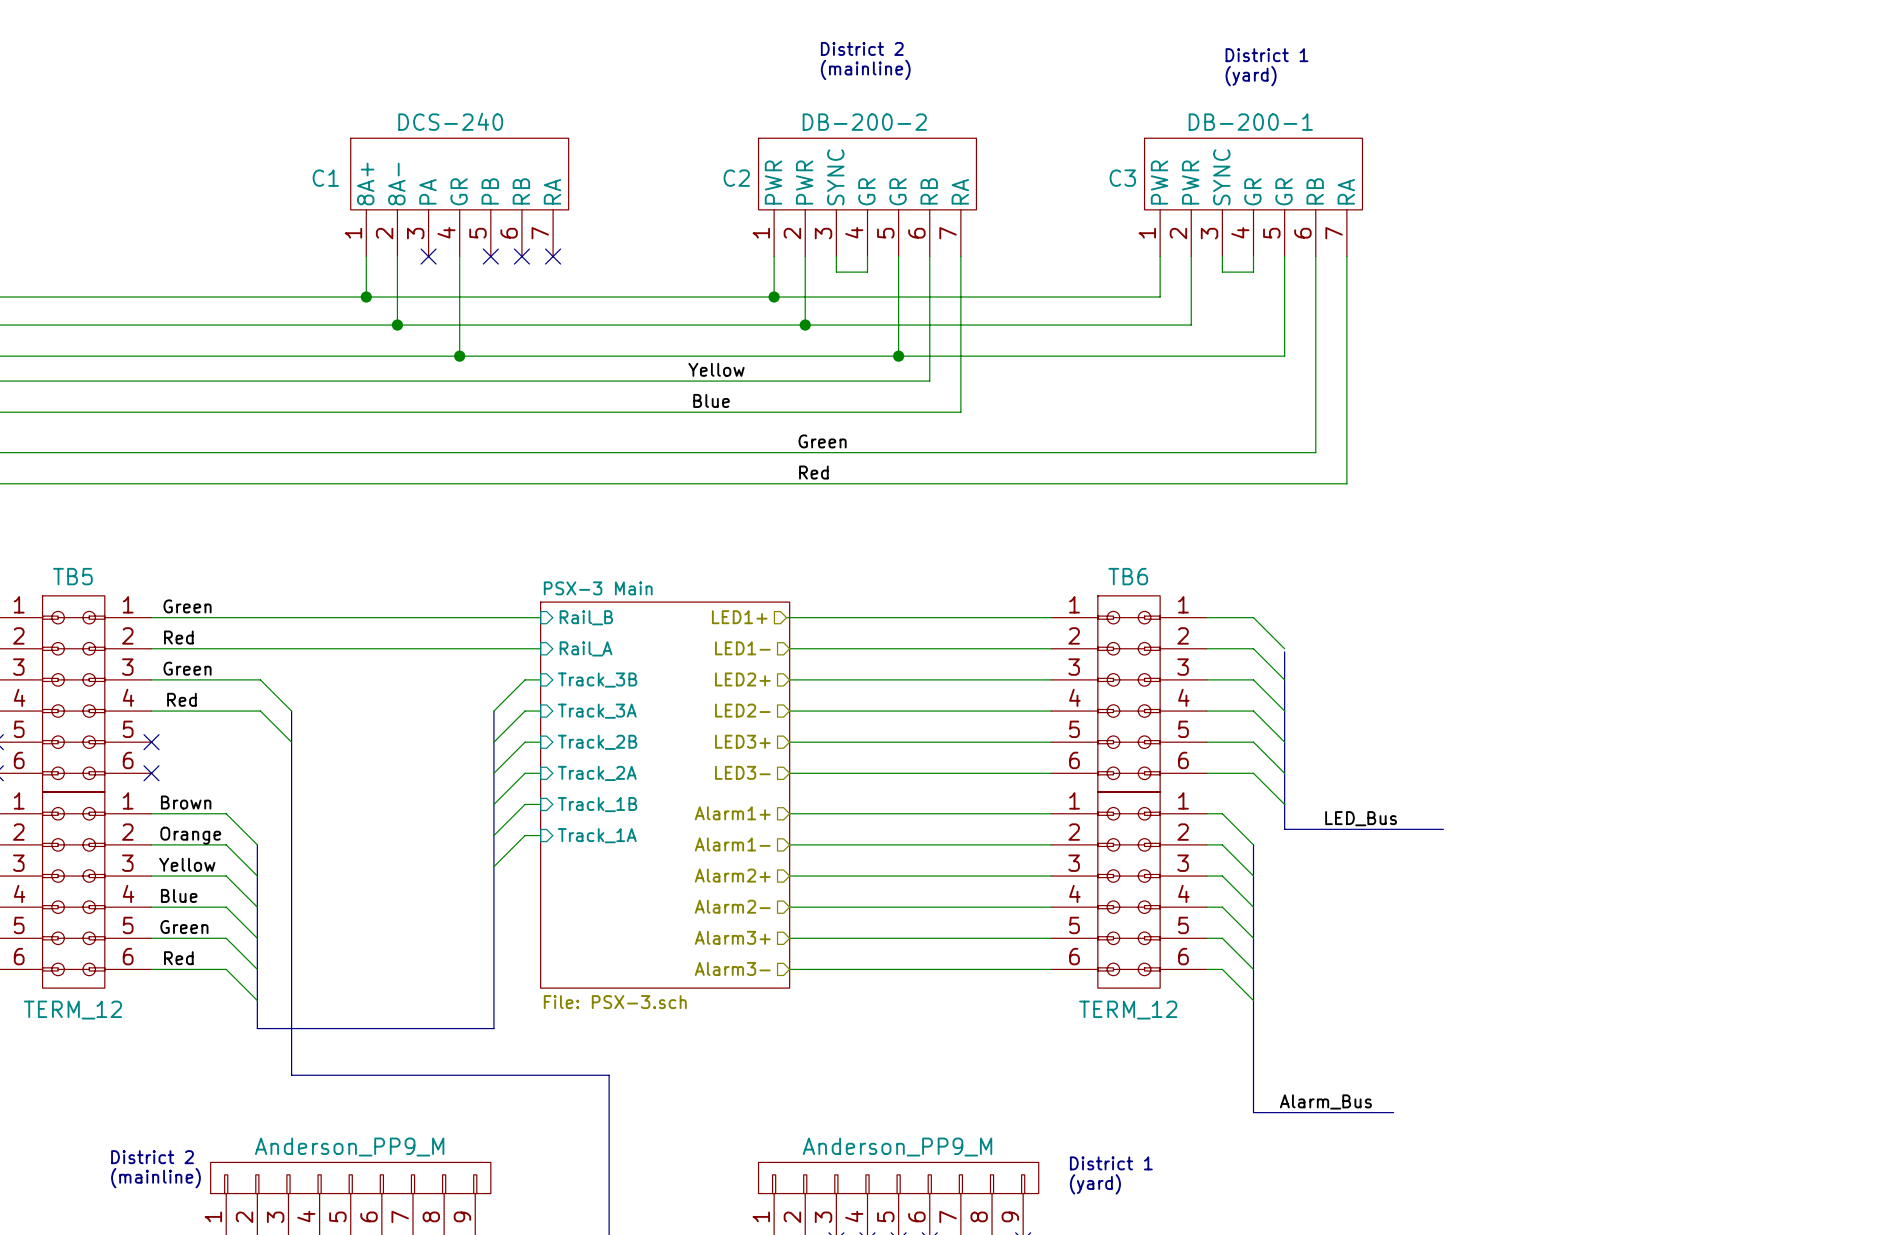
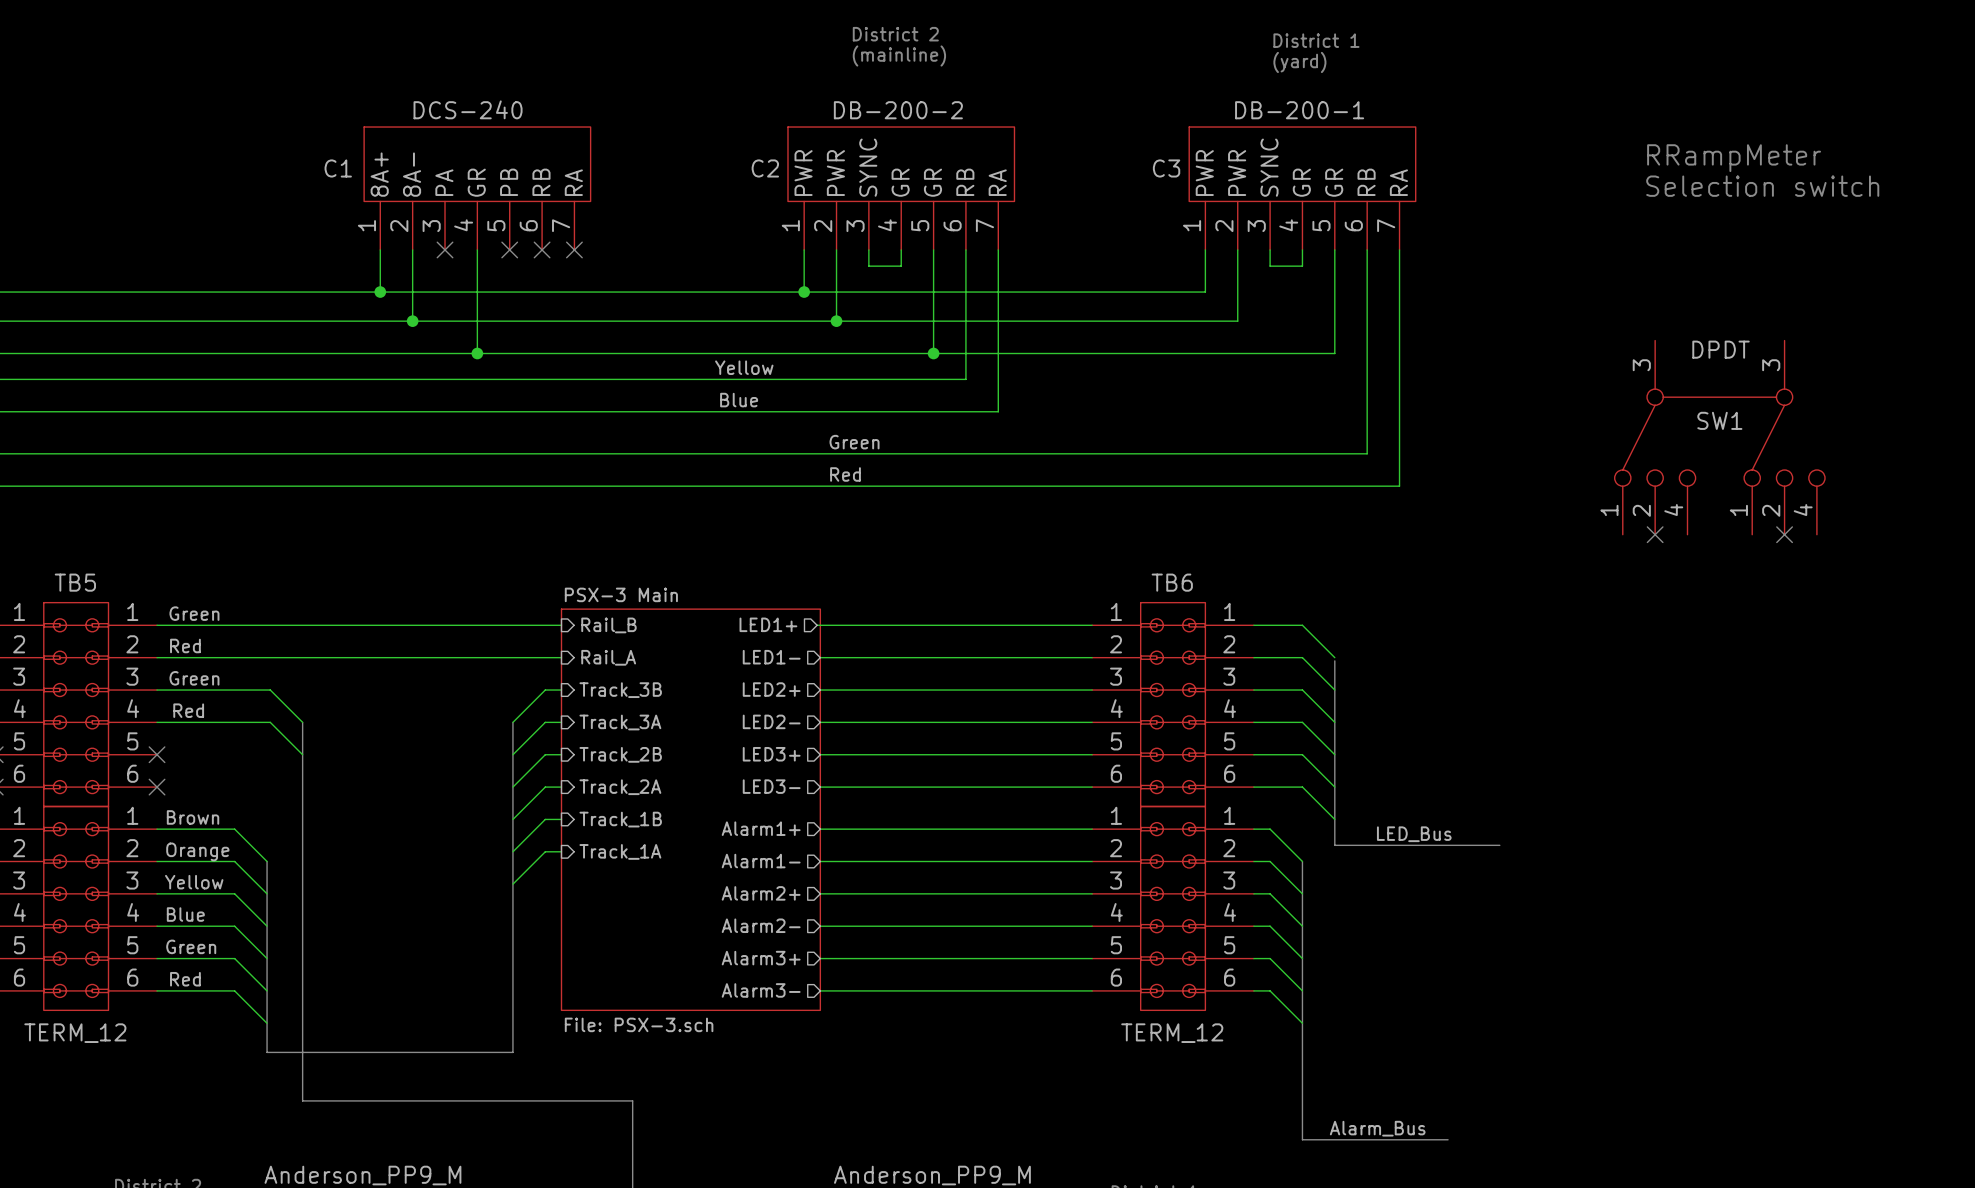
text: none -> RRampMeter (1734, 158)
text: none -> Selection switch (1762, 186)
SW1: none -> DPDT (1719, 437)
no-connect mark: none -> (1655, 534)
no-connect mark: none -> (1784, 534)

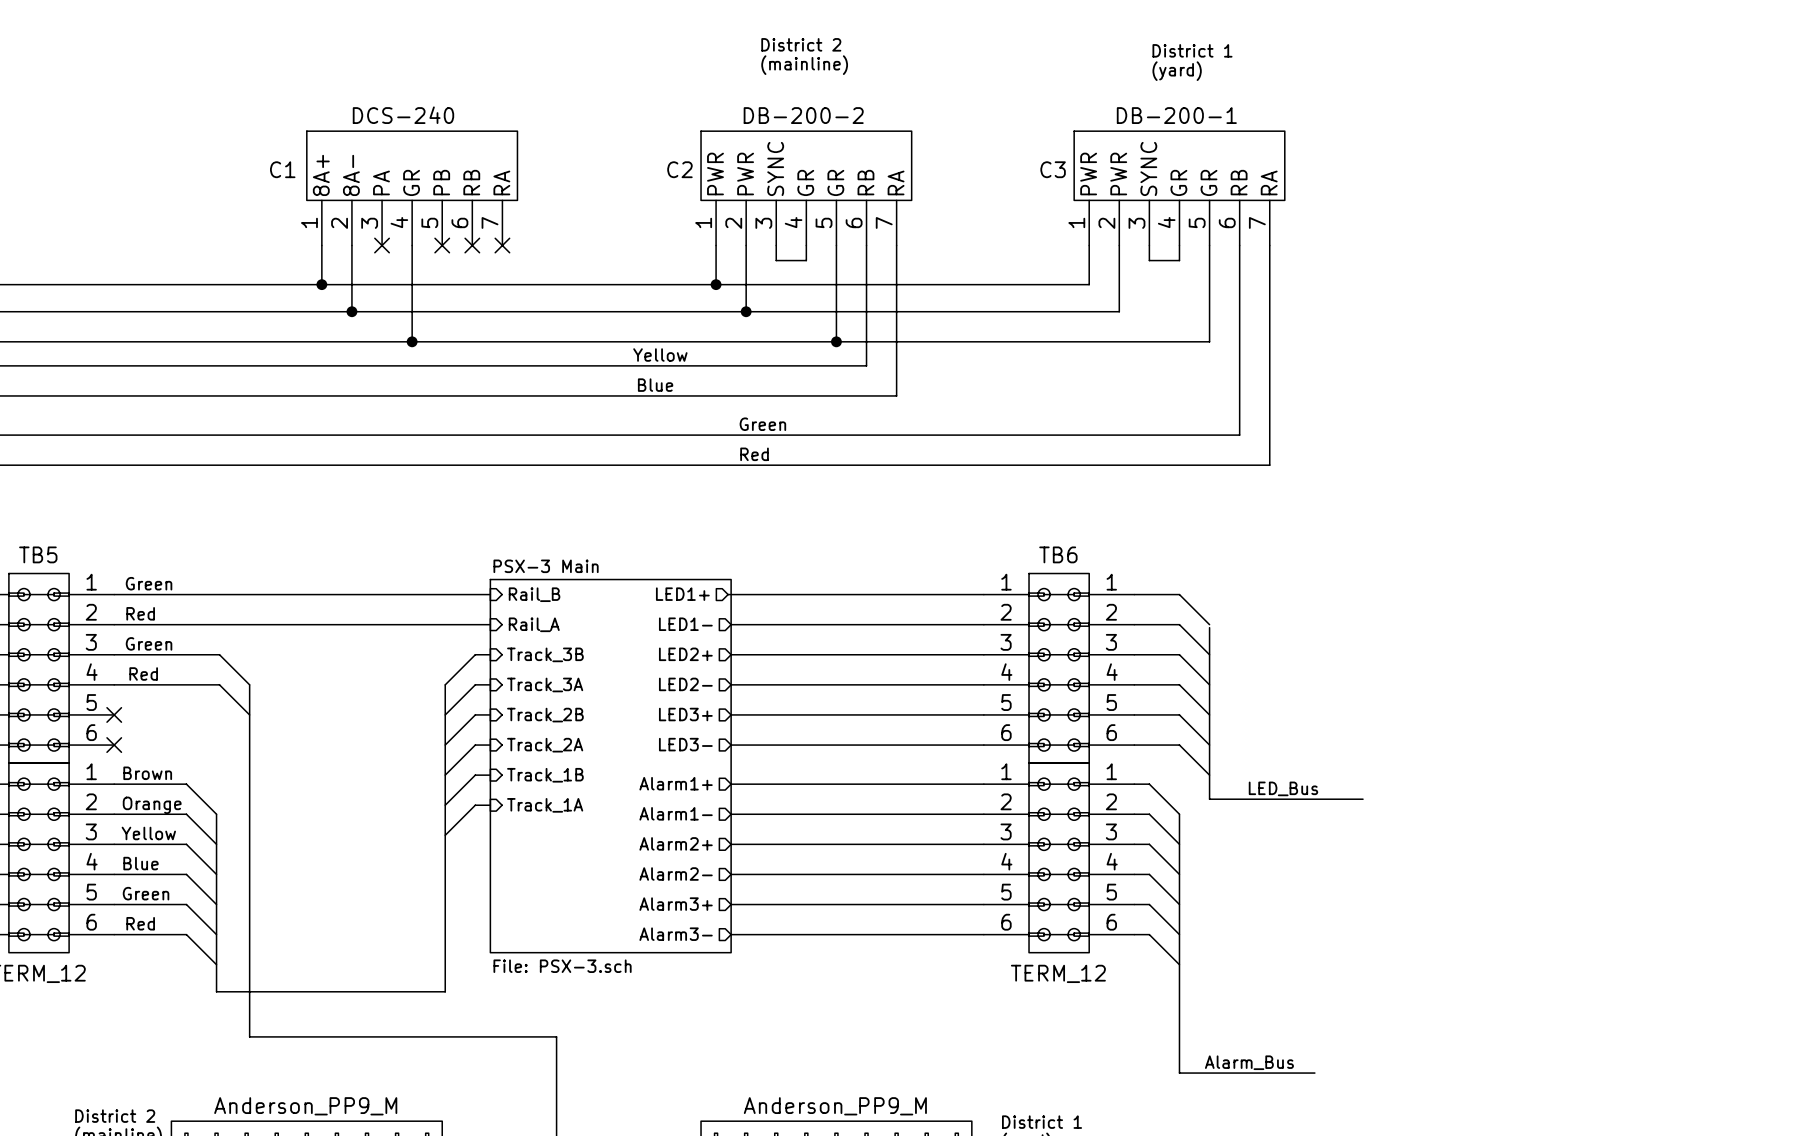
text: RRampMeter (1734, 158) -> none
text: Selection switch (1762, 186) -> none
SW1: DPDT (1719, 437) -> none
no-connect mark: (1655, 534) -> none
no-connect mark: (1784, 534) -> none

